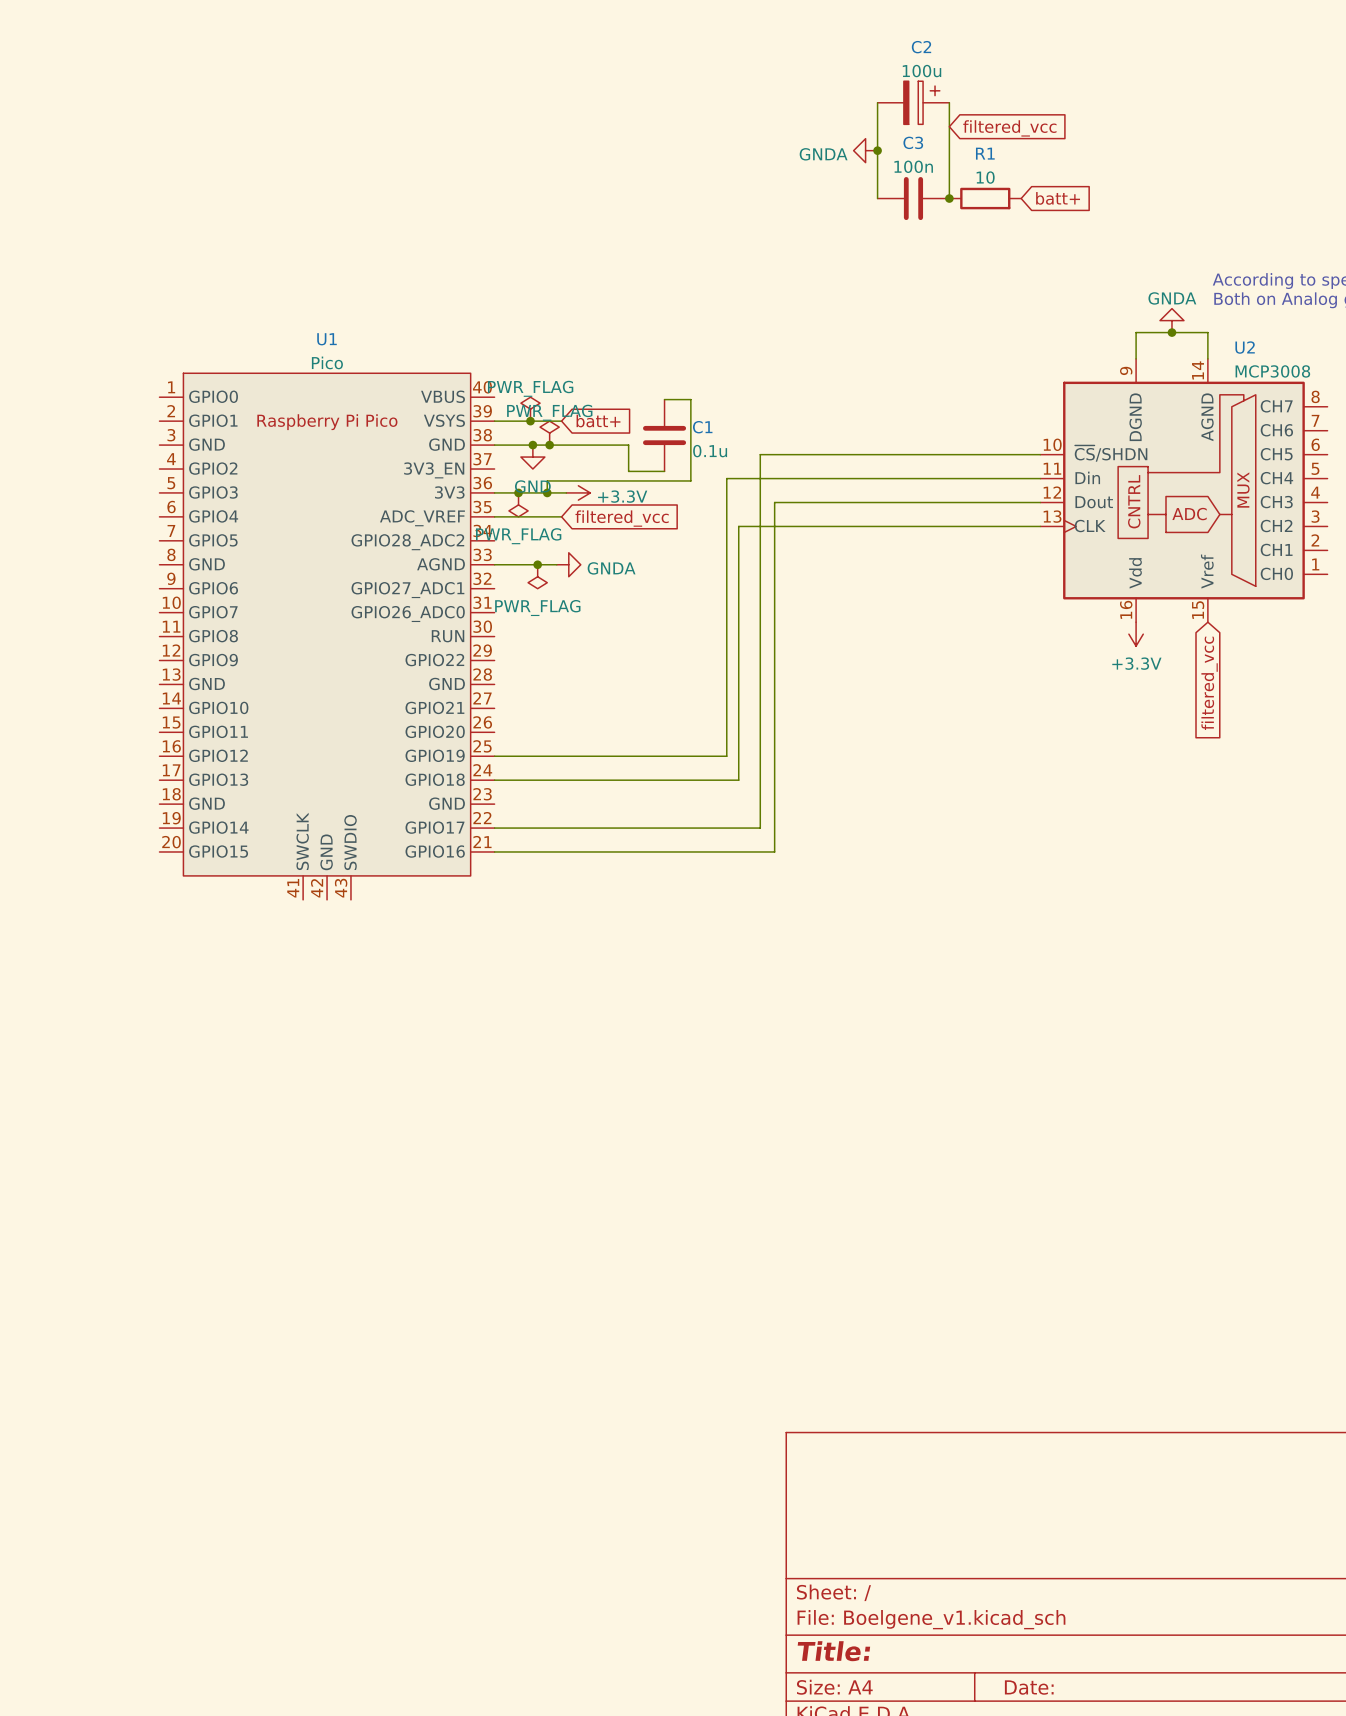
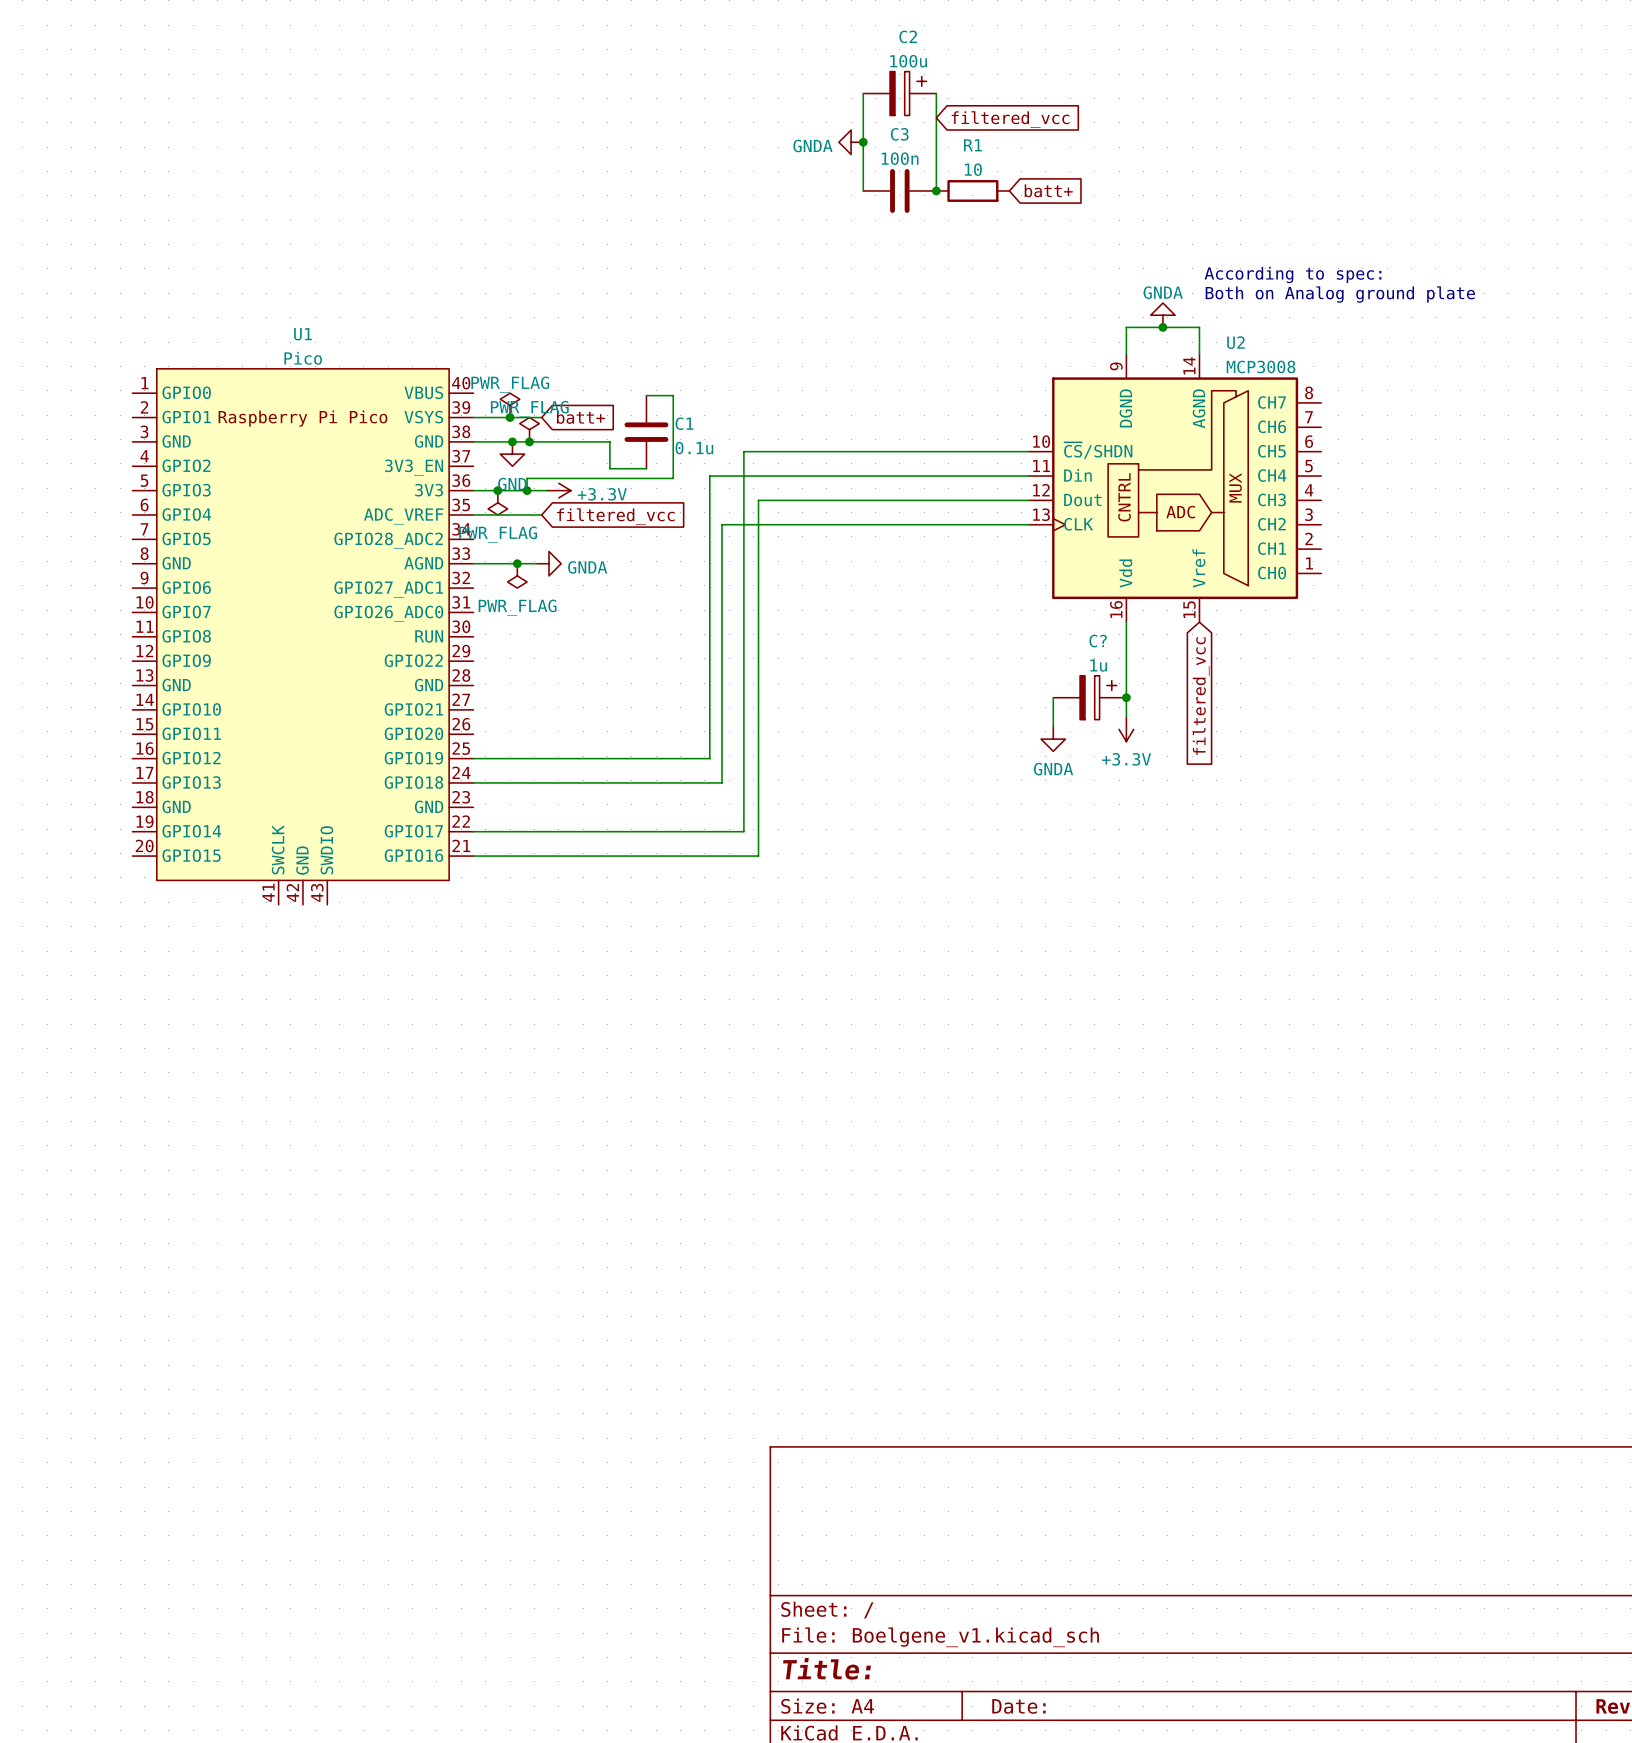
wire: none -> (1126, 622) (1126, 717)
power symbol position: +3.3V (1136, 634) -> +3.3V (1126, 729)
wire: none -> (1053, 697) (1053, 726)
C?: none -> 1u (1089, 697)
junction: none -> (1126, 697)
power symbol: none -> GNDA (1053, 739)

